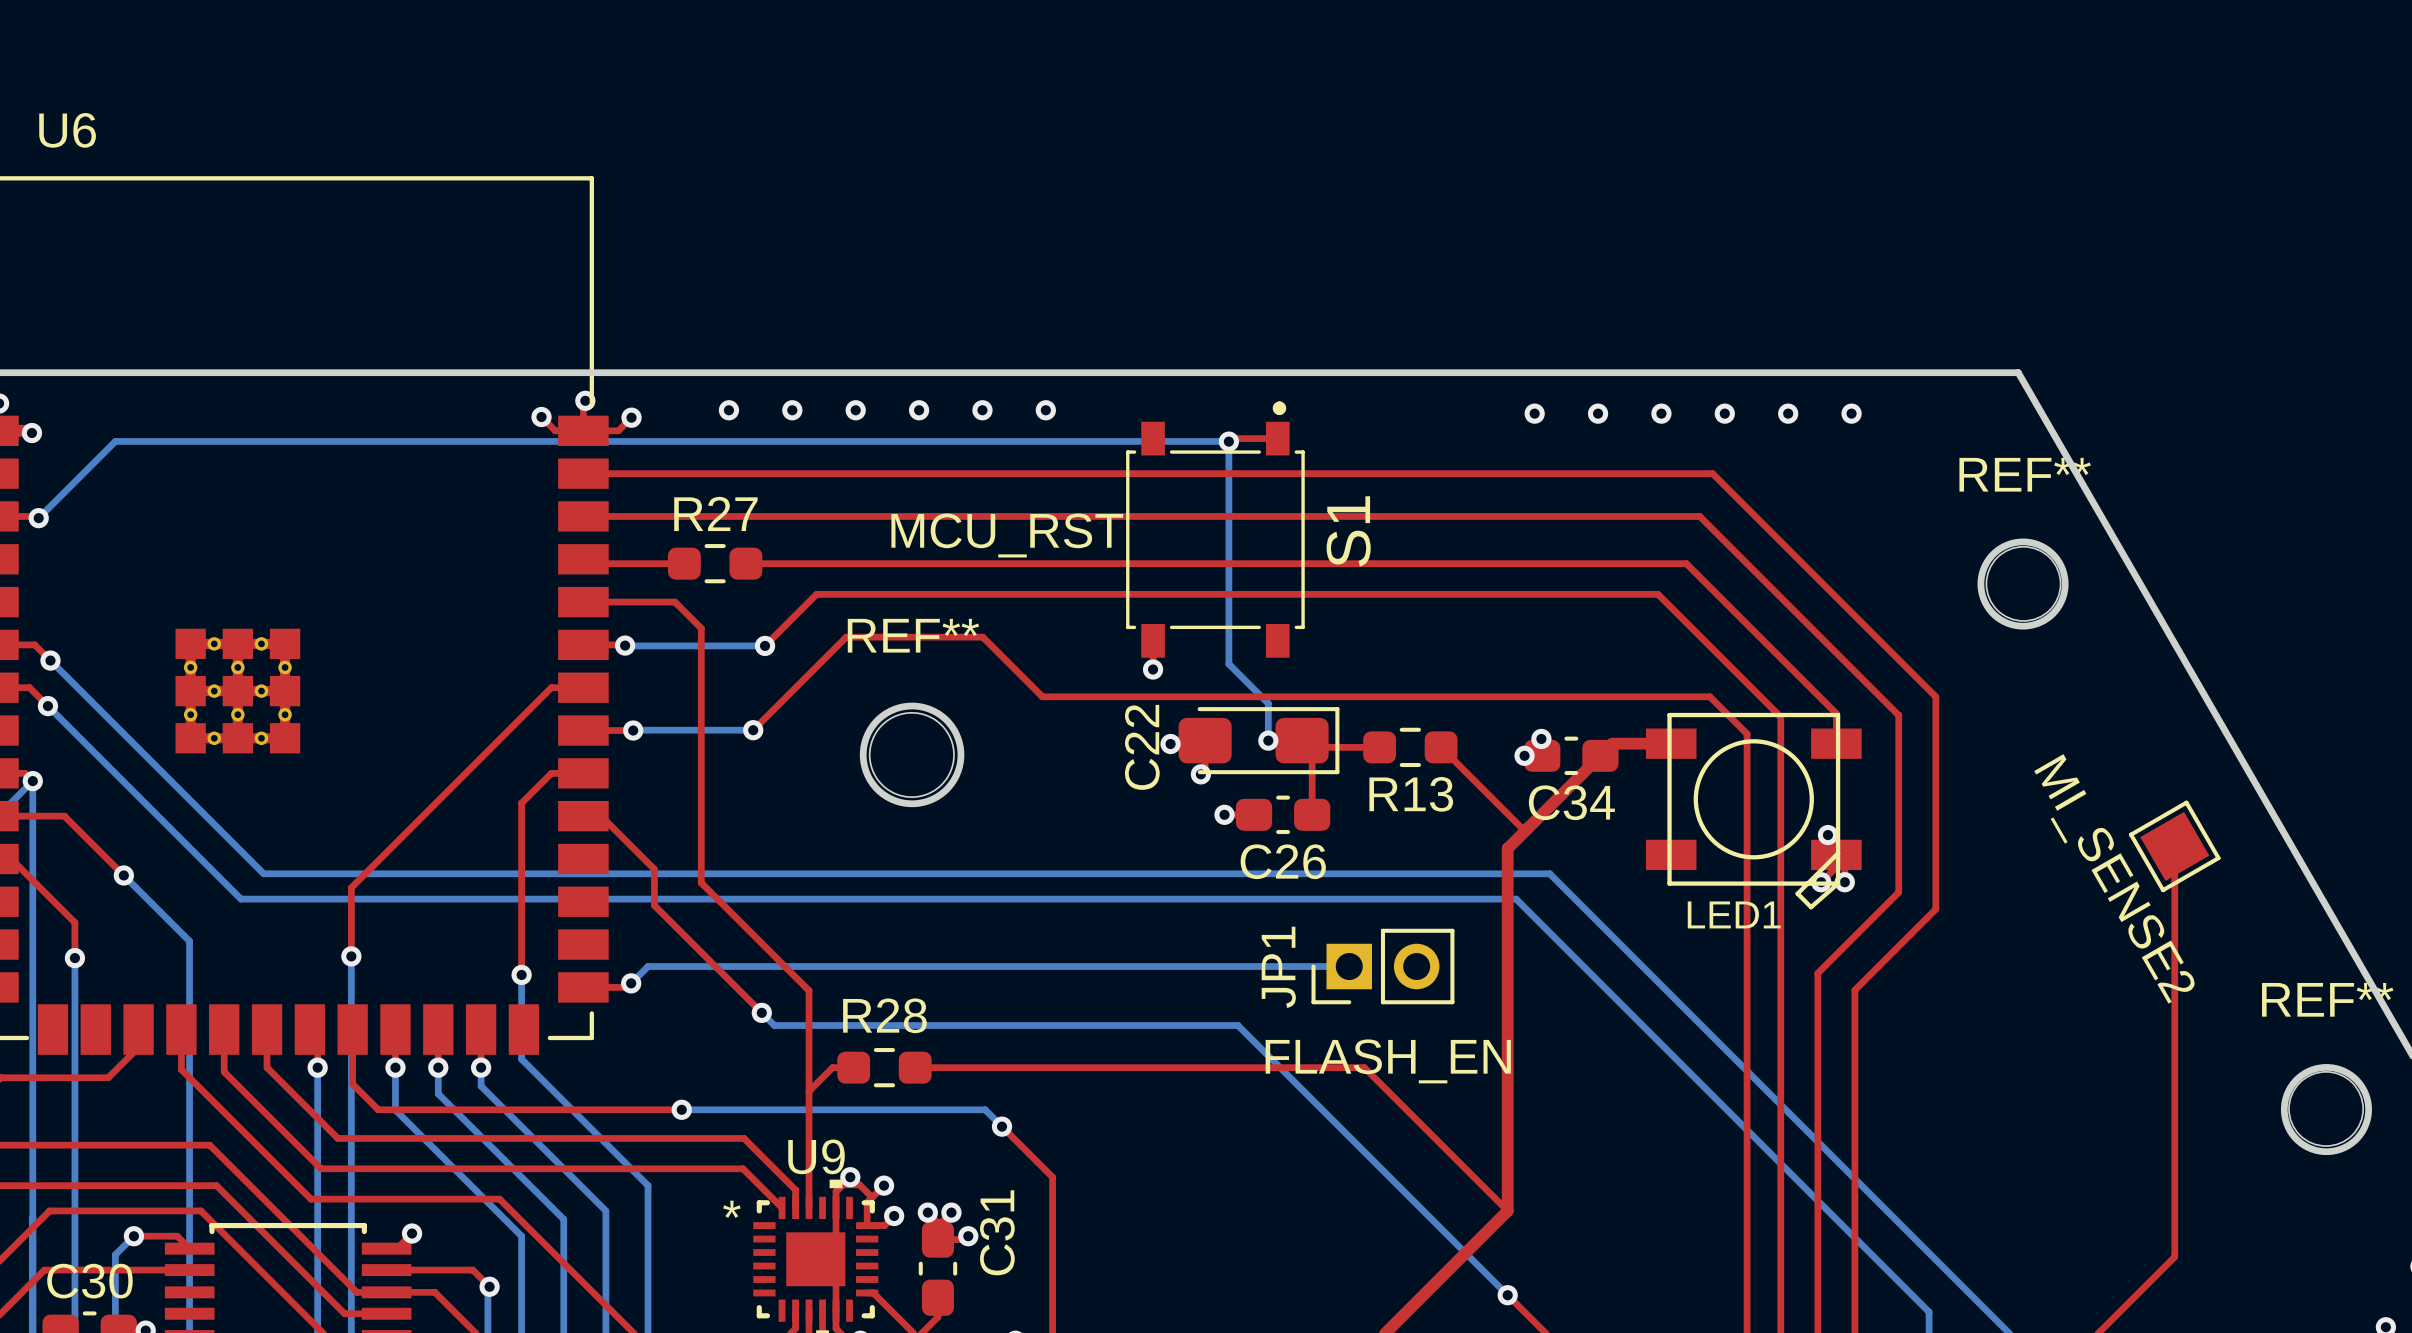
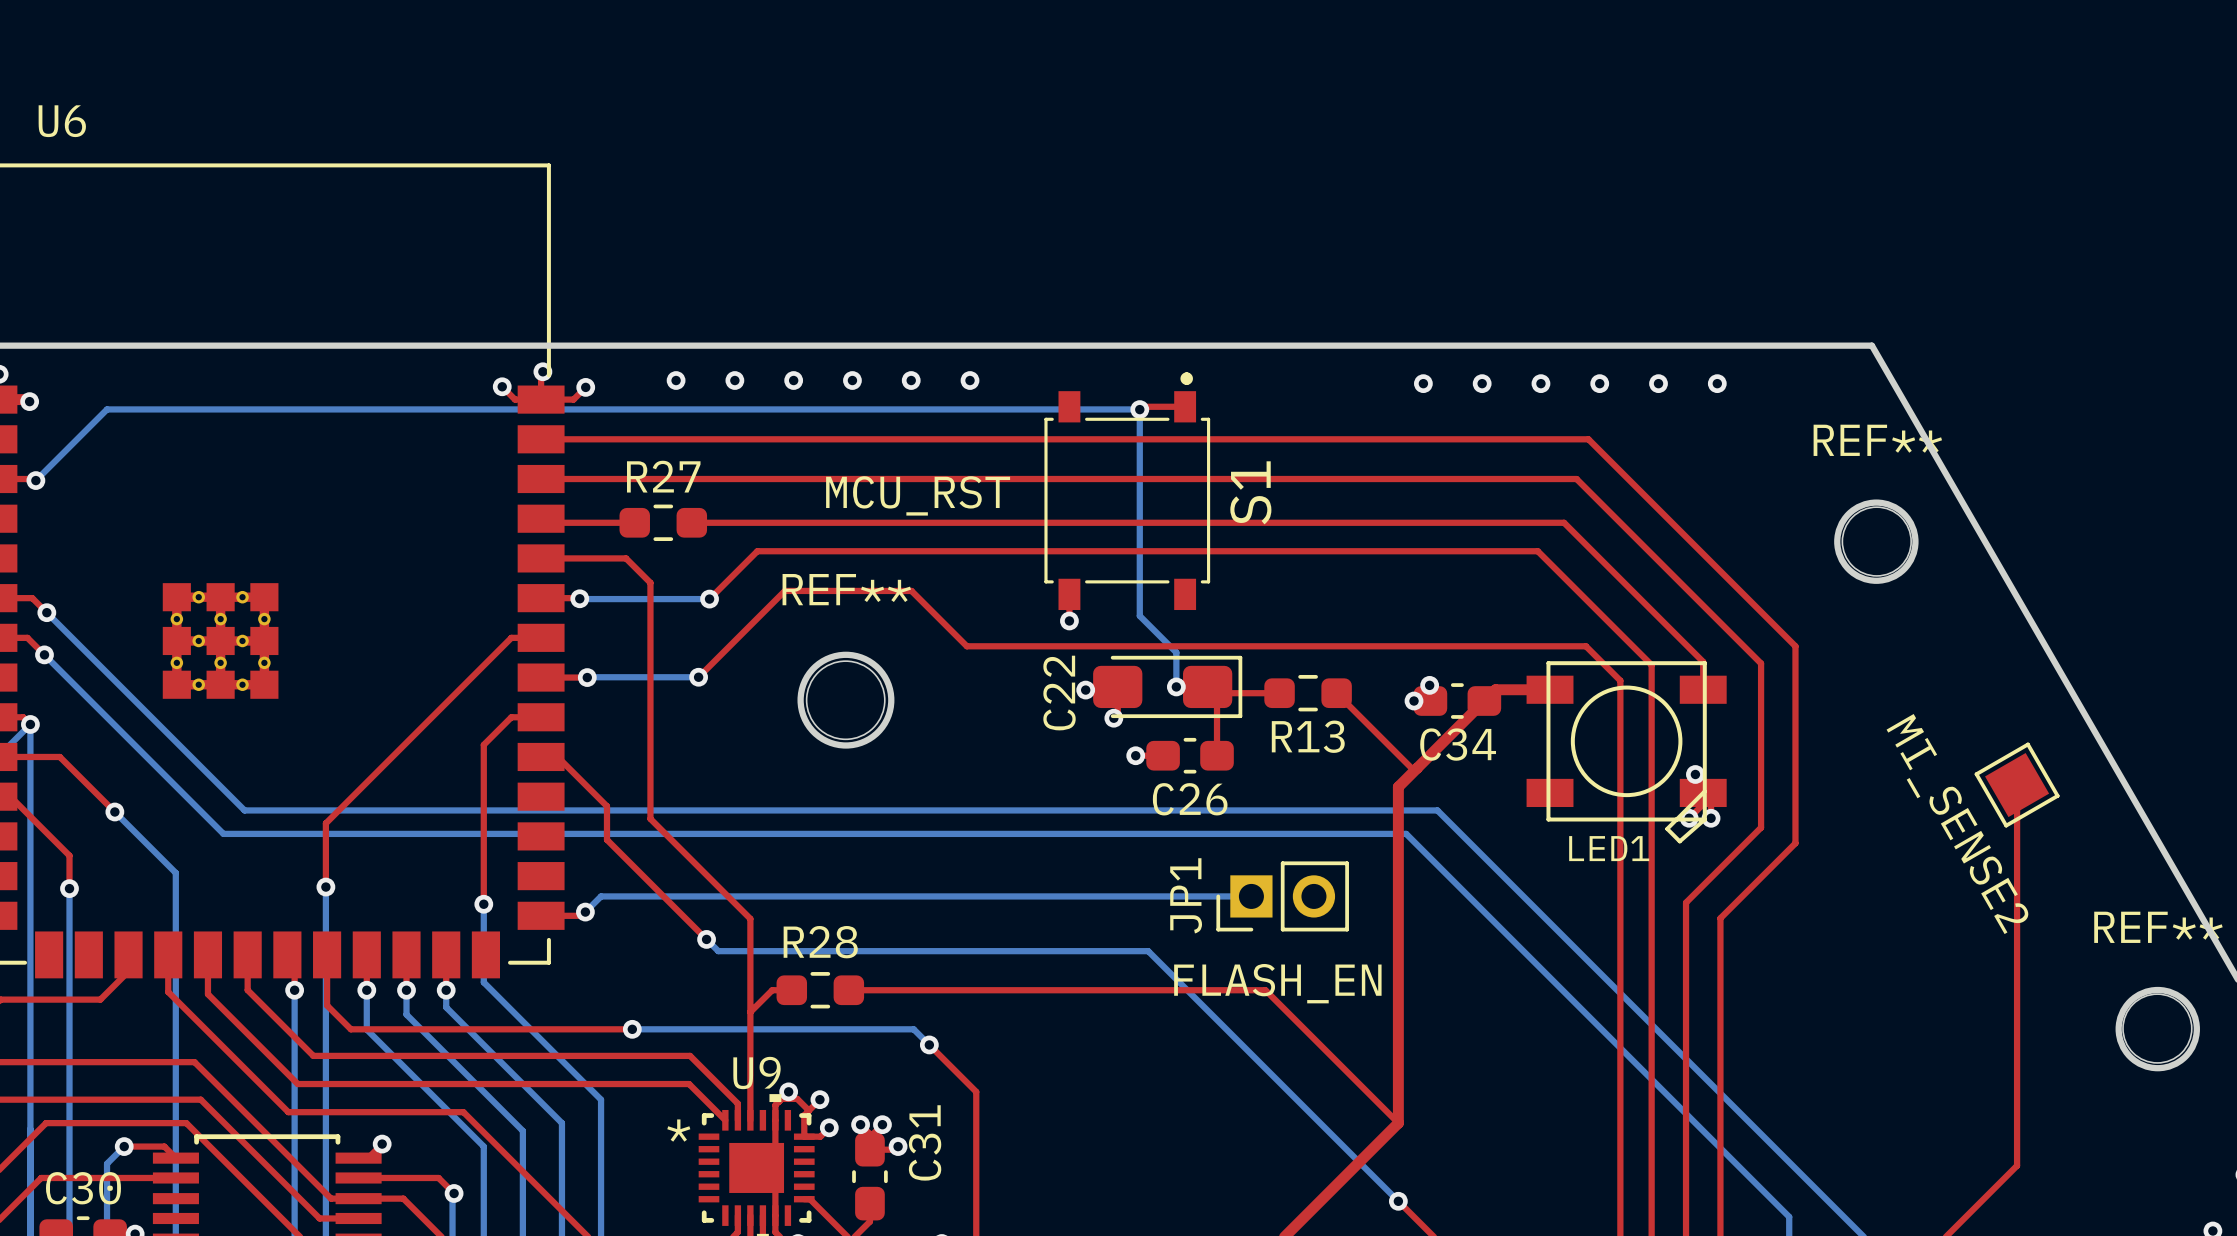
MI_SENSE2 name: MI_SENSE2 (2114, 878) -> none
MI_SENSE2 value: none -> MI_SENSE2 (1957, 824)

